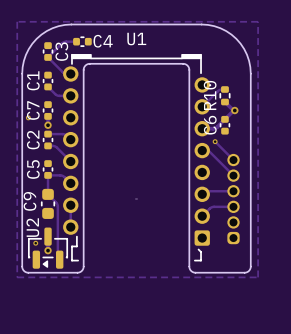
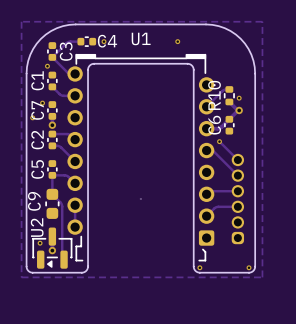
via: none -> (103, 41)
via: none -> (177, 41)
via: none -> (47, 66)
via: none -> (239, 98)
via: none -> (42, 103)
via: none -> (199, 267)
via: none -> (249, 267)

